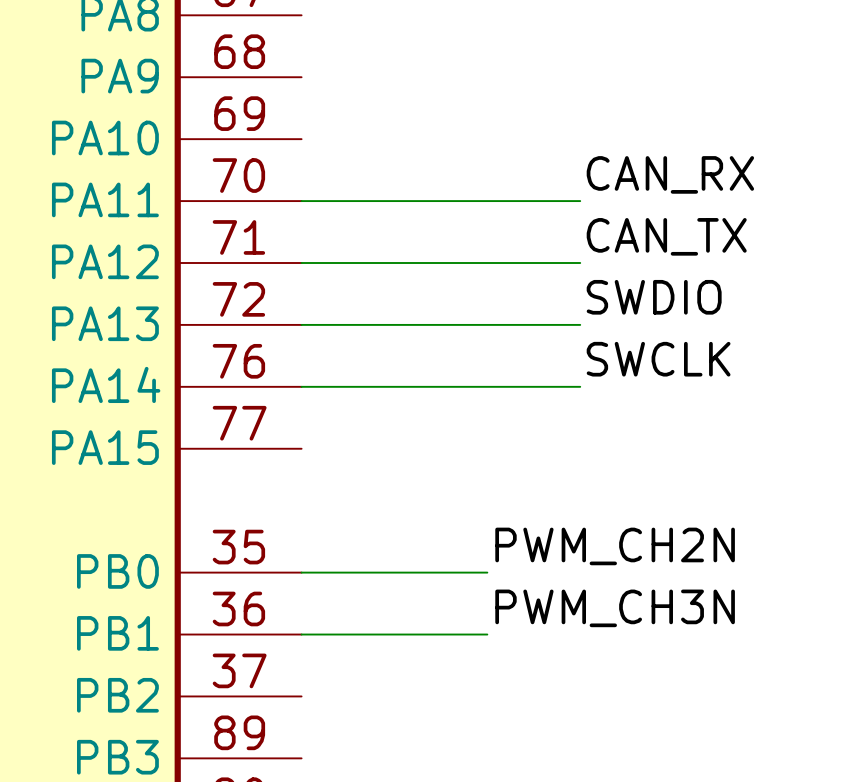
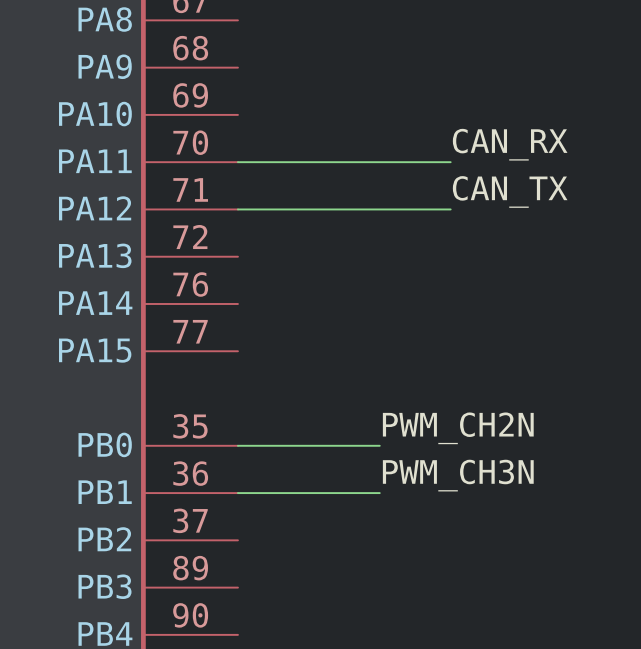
label: SWDIO (654, 297) -> none
wire: (301, 324) (580, 324) -> none
label: SWCLK (658, 359) -> none
wire: (301, 386) (580, 386) -> none

